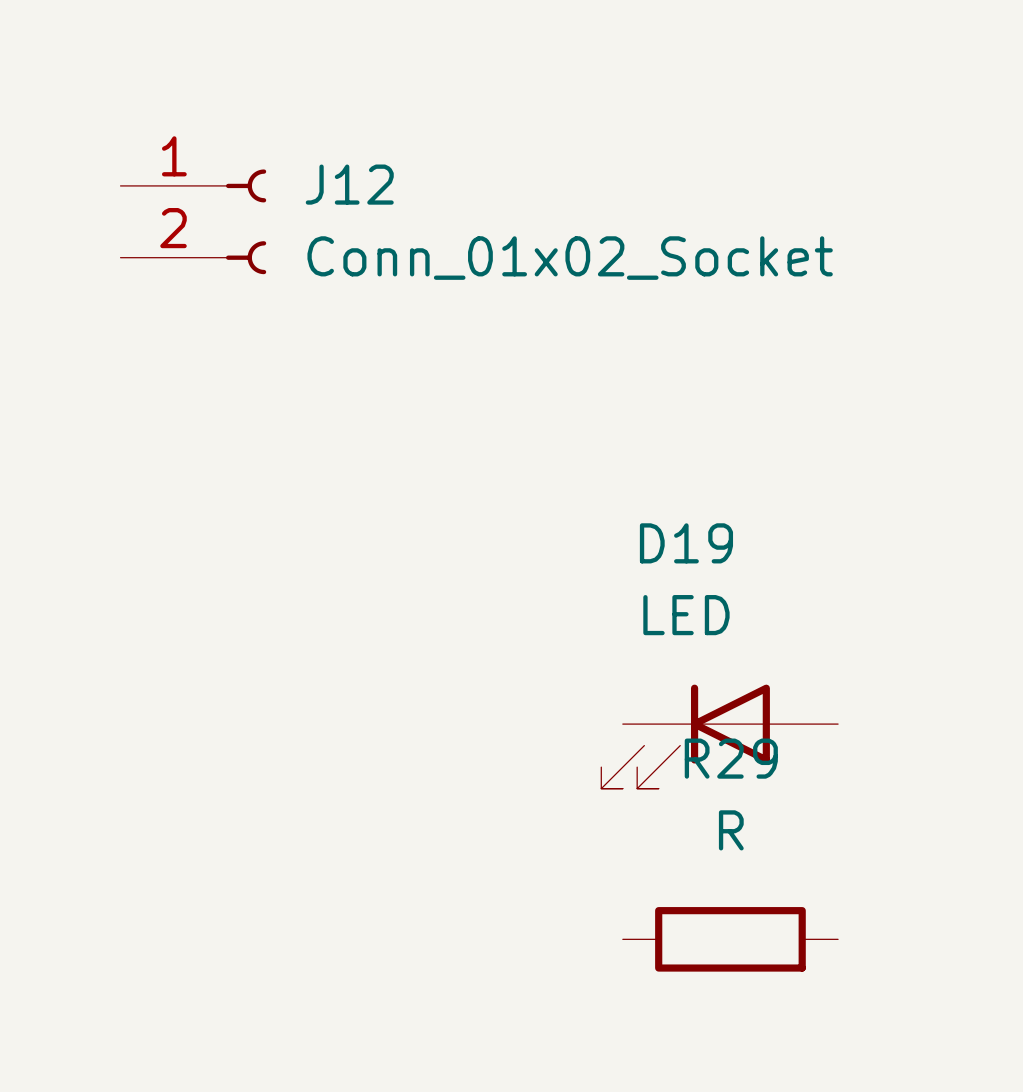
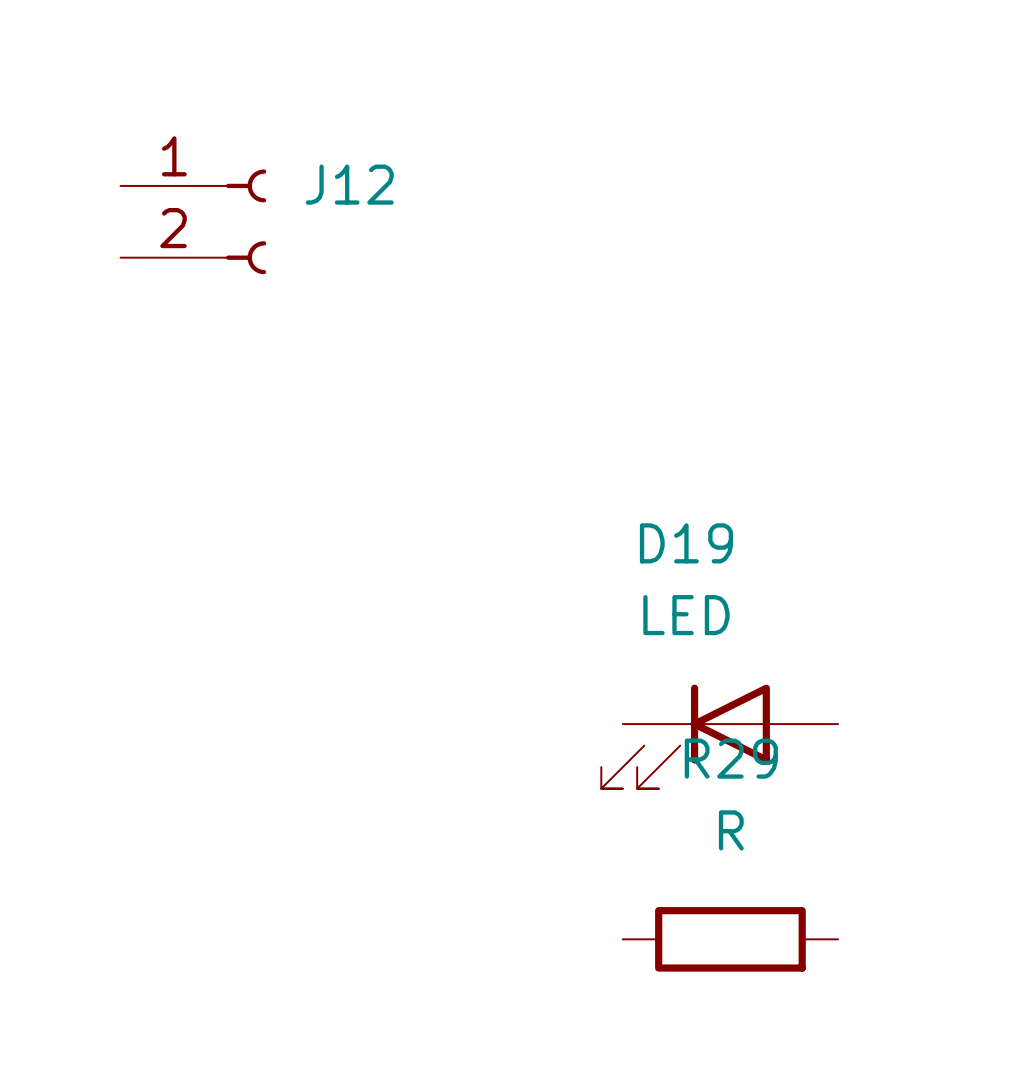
J12 value: Conn_01x02_Socket (570, 258) -> none

